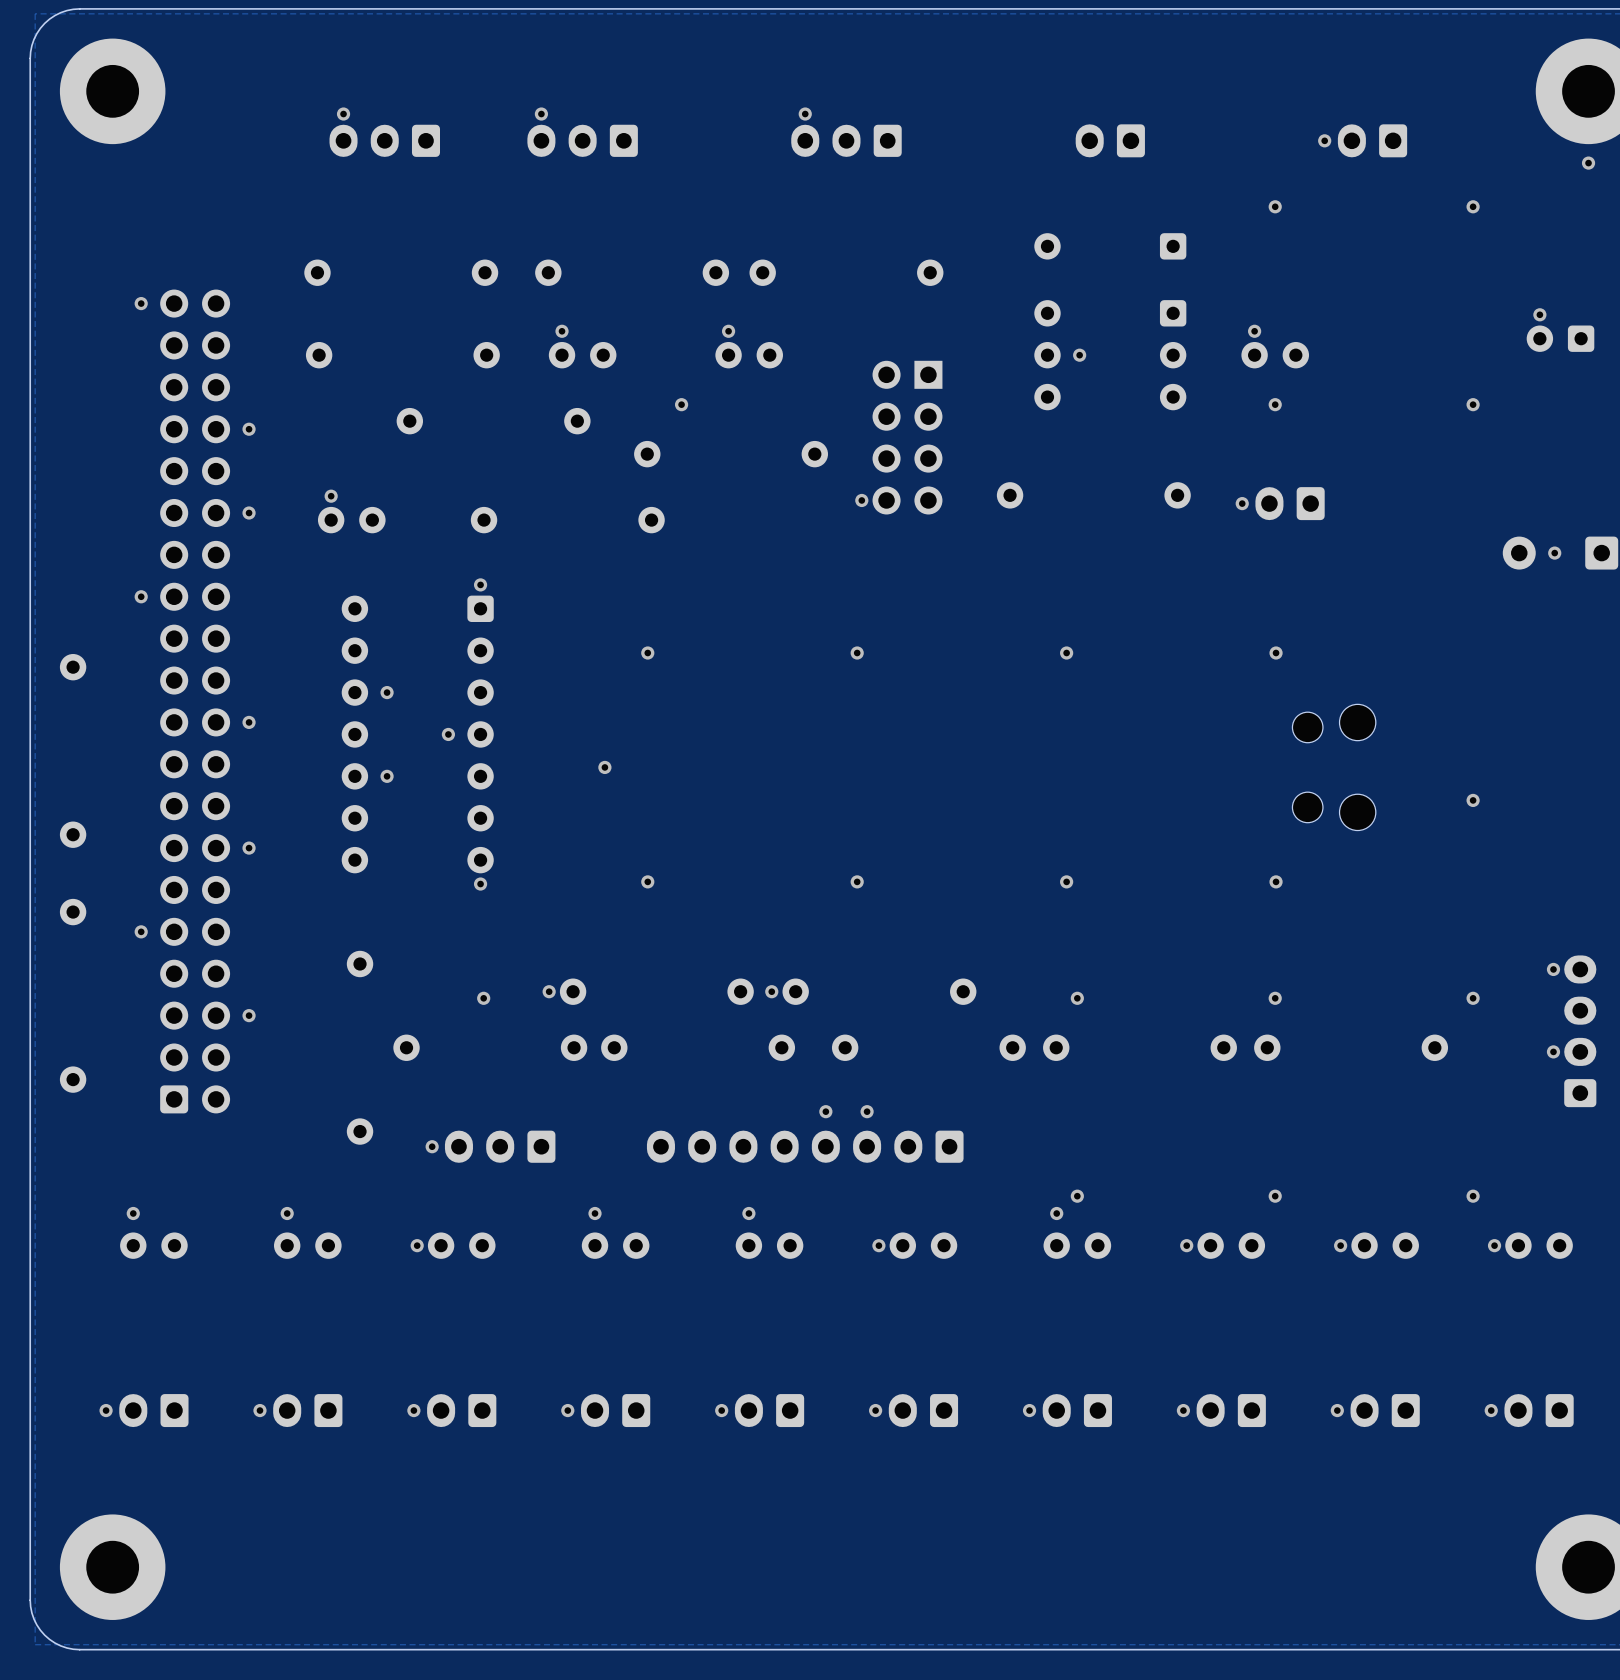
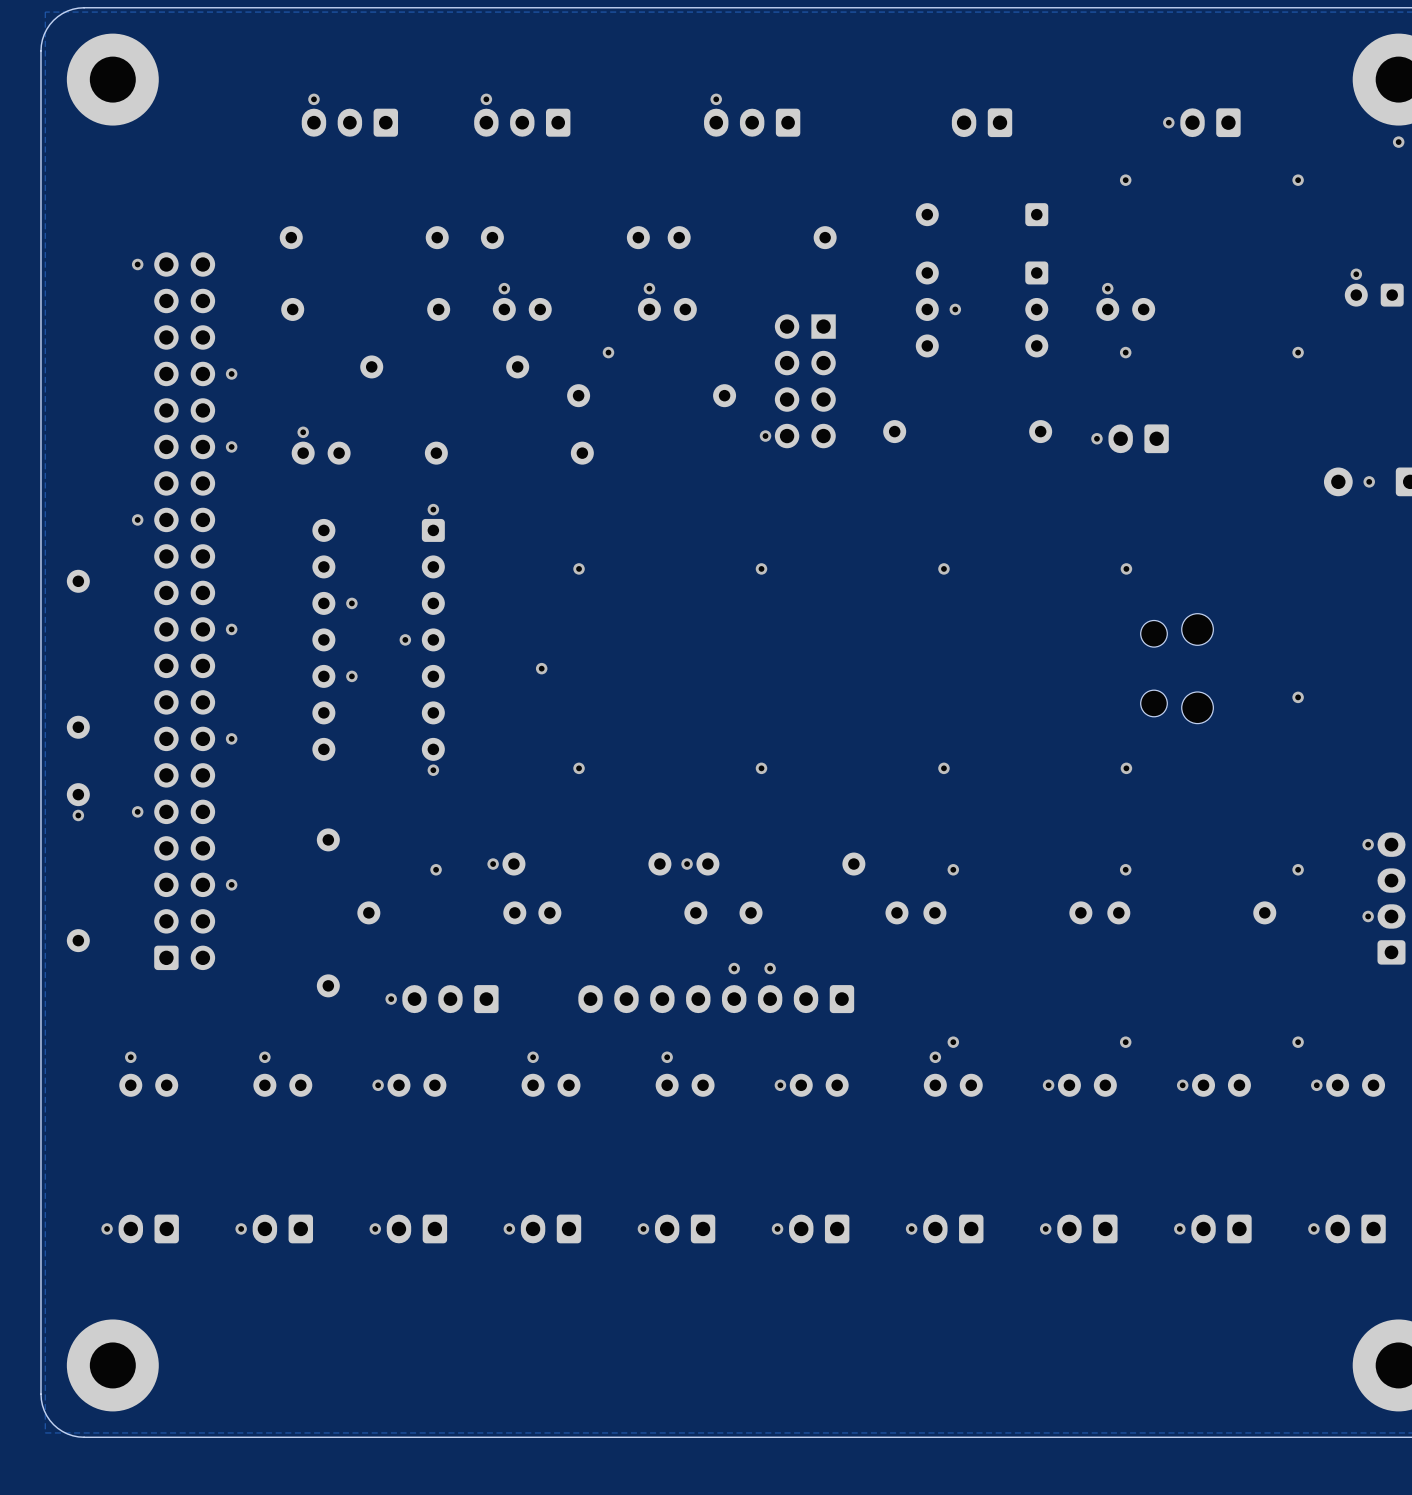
via: none -> (78, 815)

